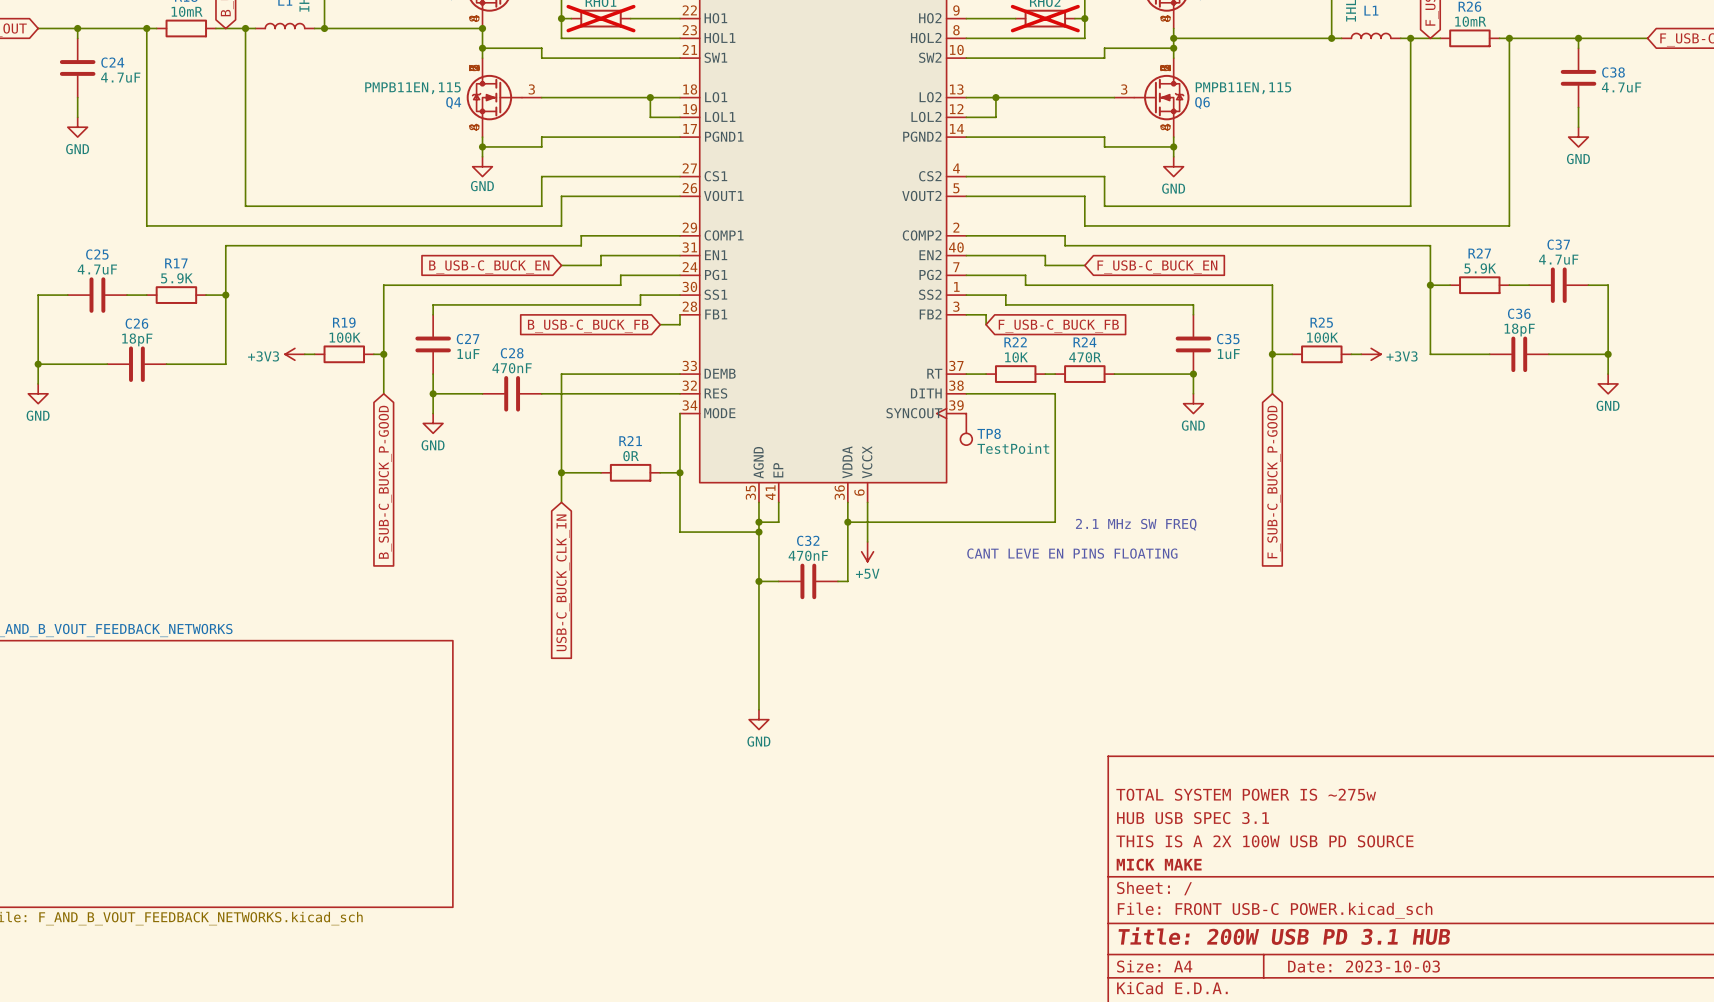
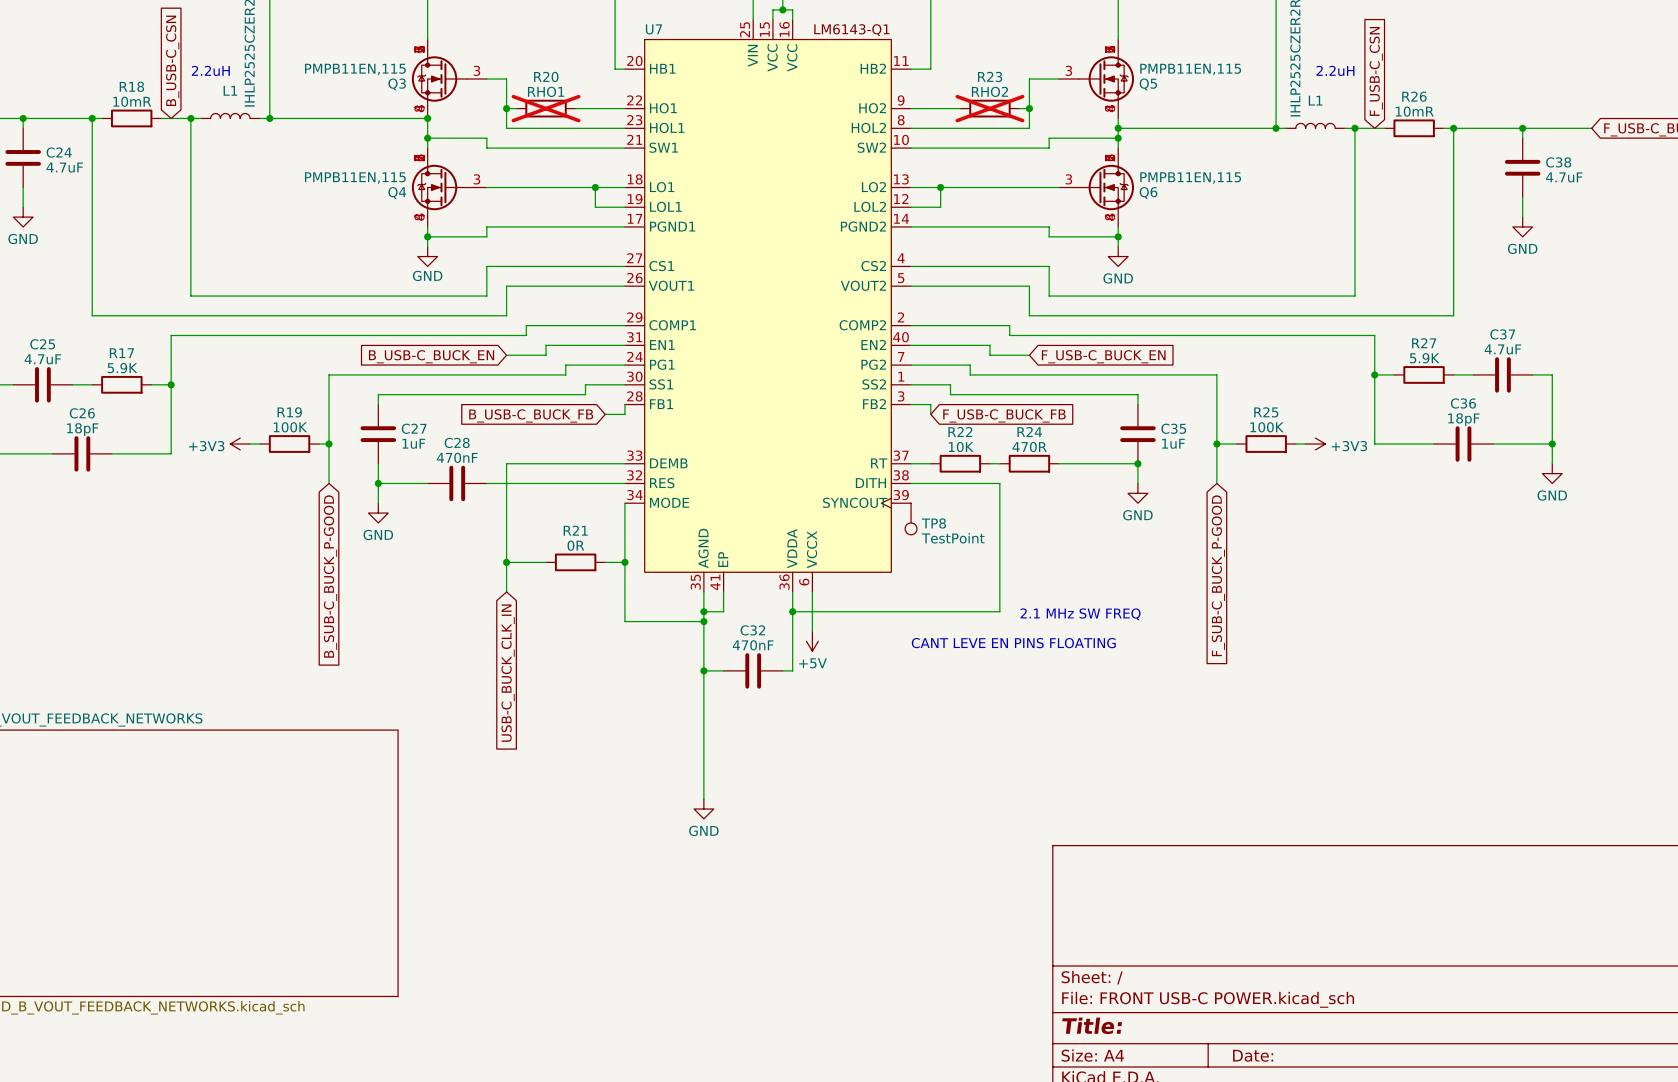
title block: TOTAL SYSTEM POWER IS ~275w (1246, 794) -> none
title block: HUB USB SPEC 3.1 (1193, 818) -> none
title block: THIS IS A 2X 100W USB PD SOURCE (1264, 841) -> none
title block: MICK MAKE (1159, 864) -> none
title block: Title: 200W USB PD 3.1 HUB (1284, 936) -> Title: (1092, 1025)
title block: Date: 2023-10-03 (1364, 966) -> Date: (1253, 1055)

